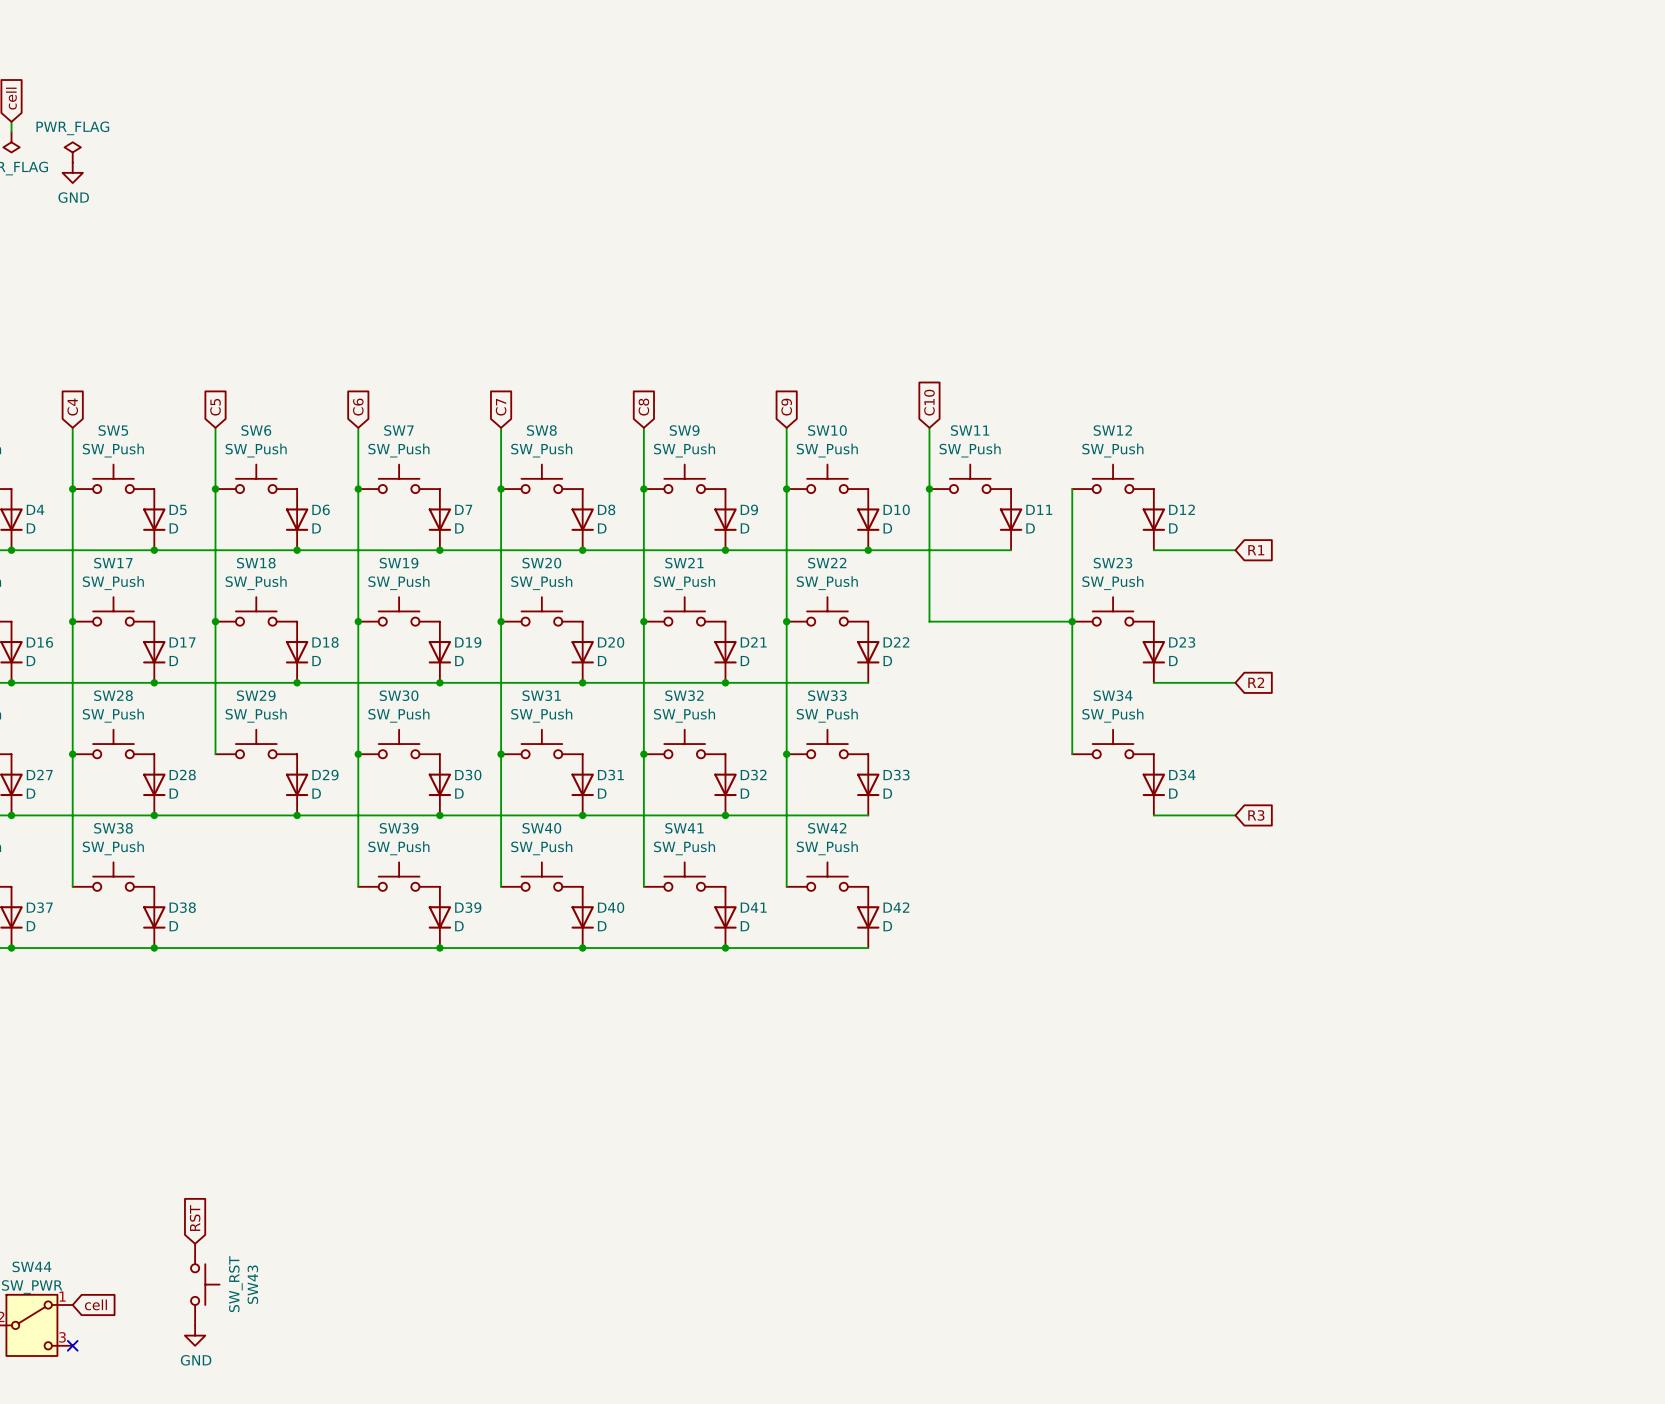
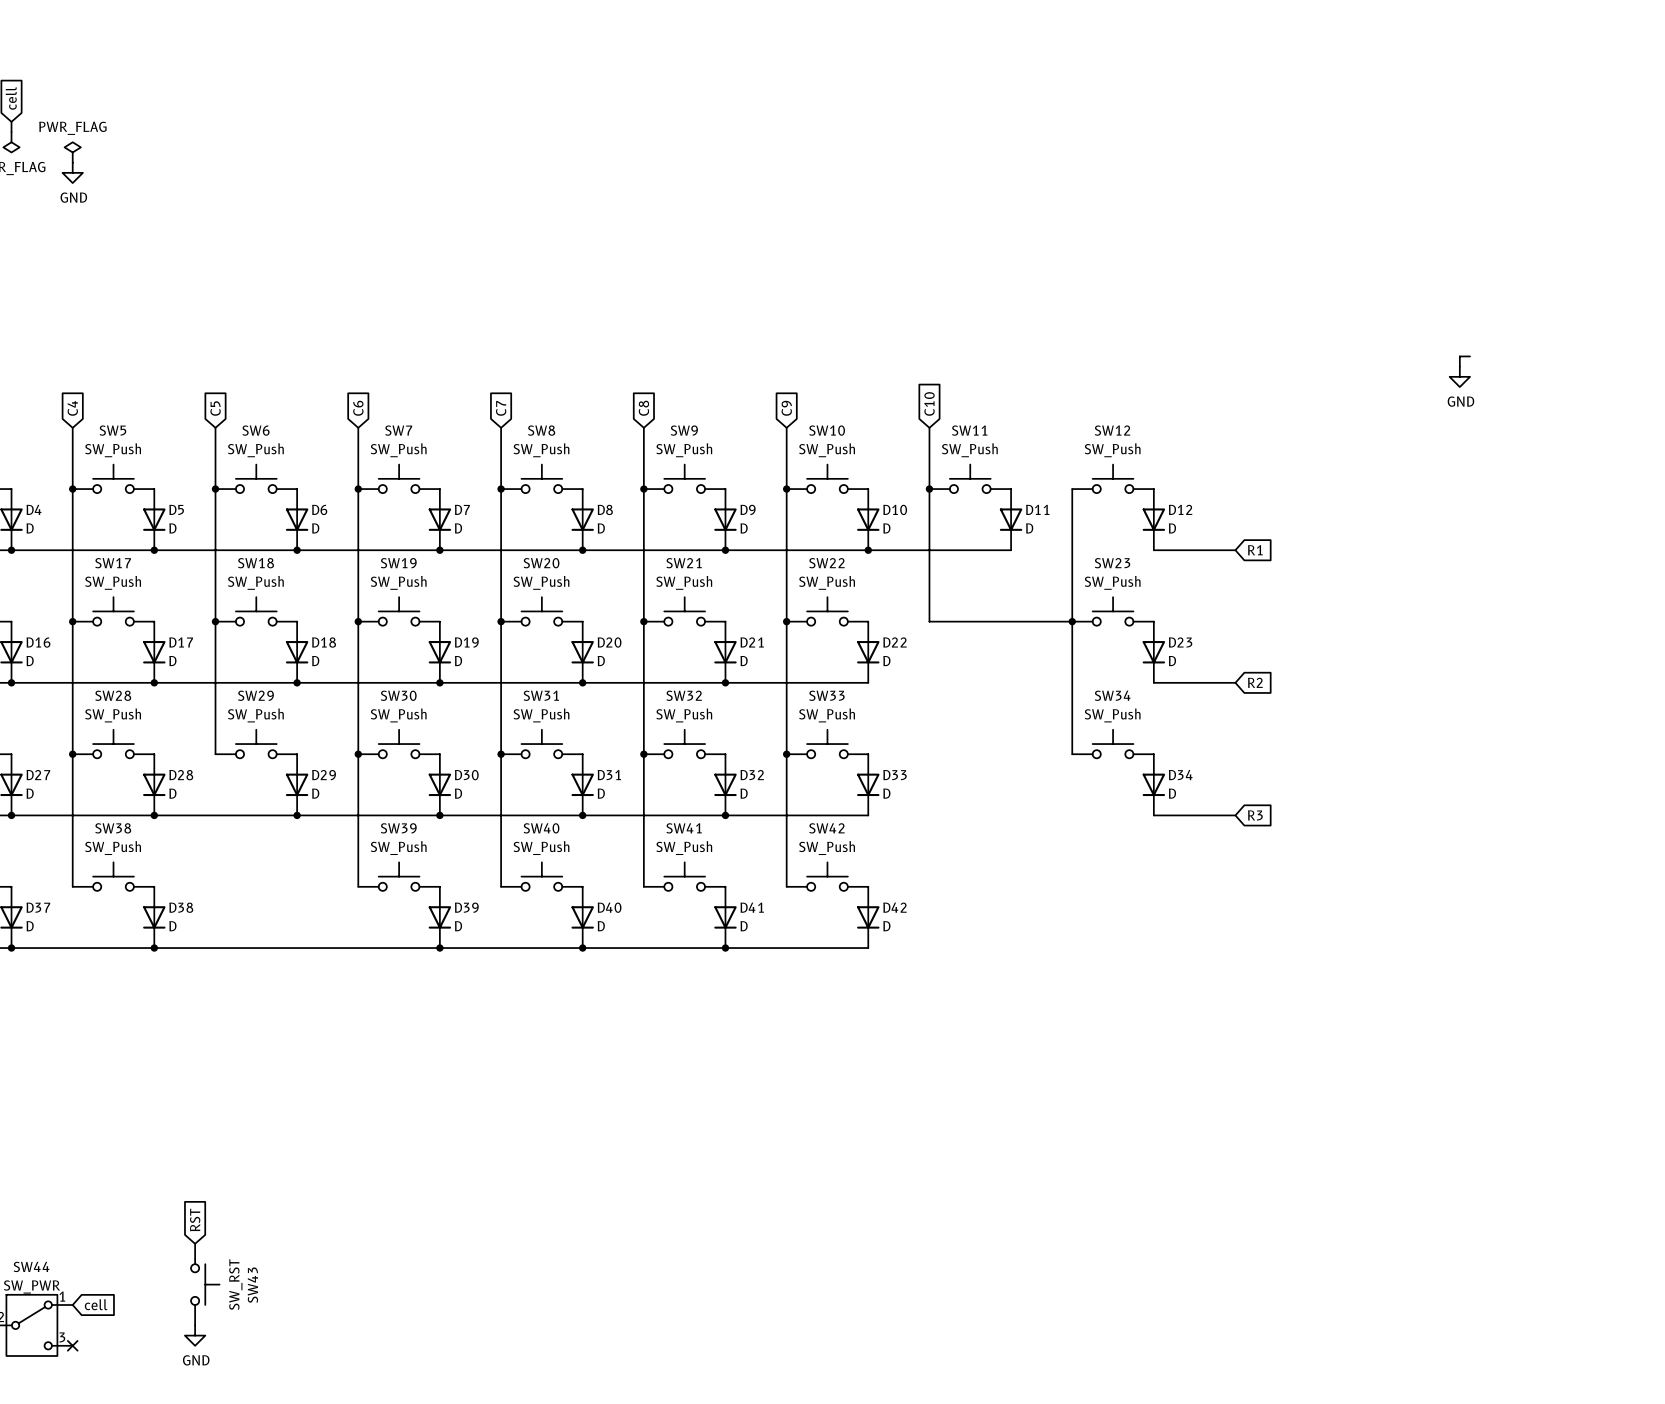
wire: none -> (1470, 356) (1459, 356) (1459, 366)
power symbol: none -> GND (1459, 376)

